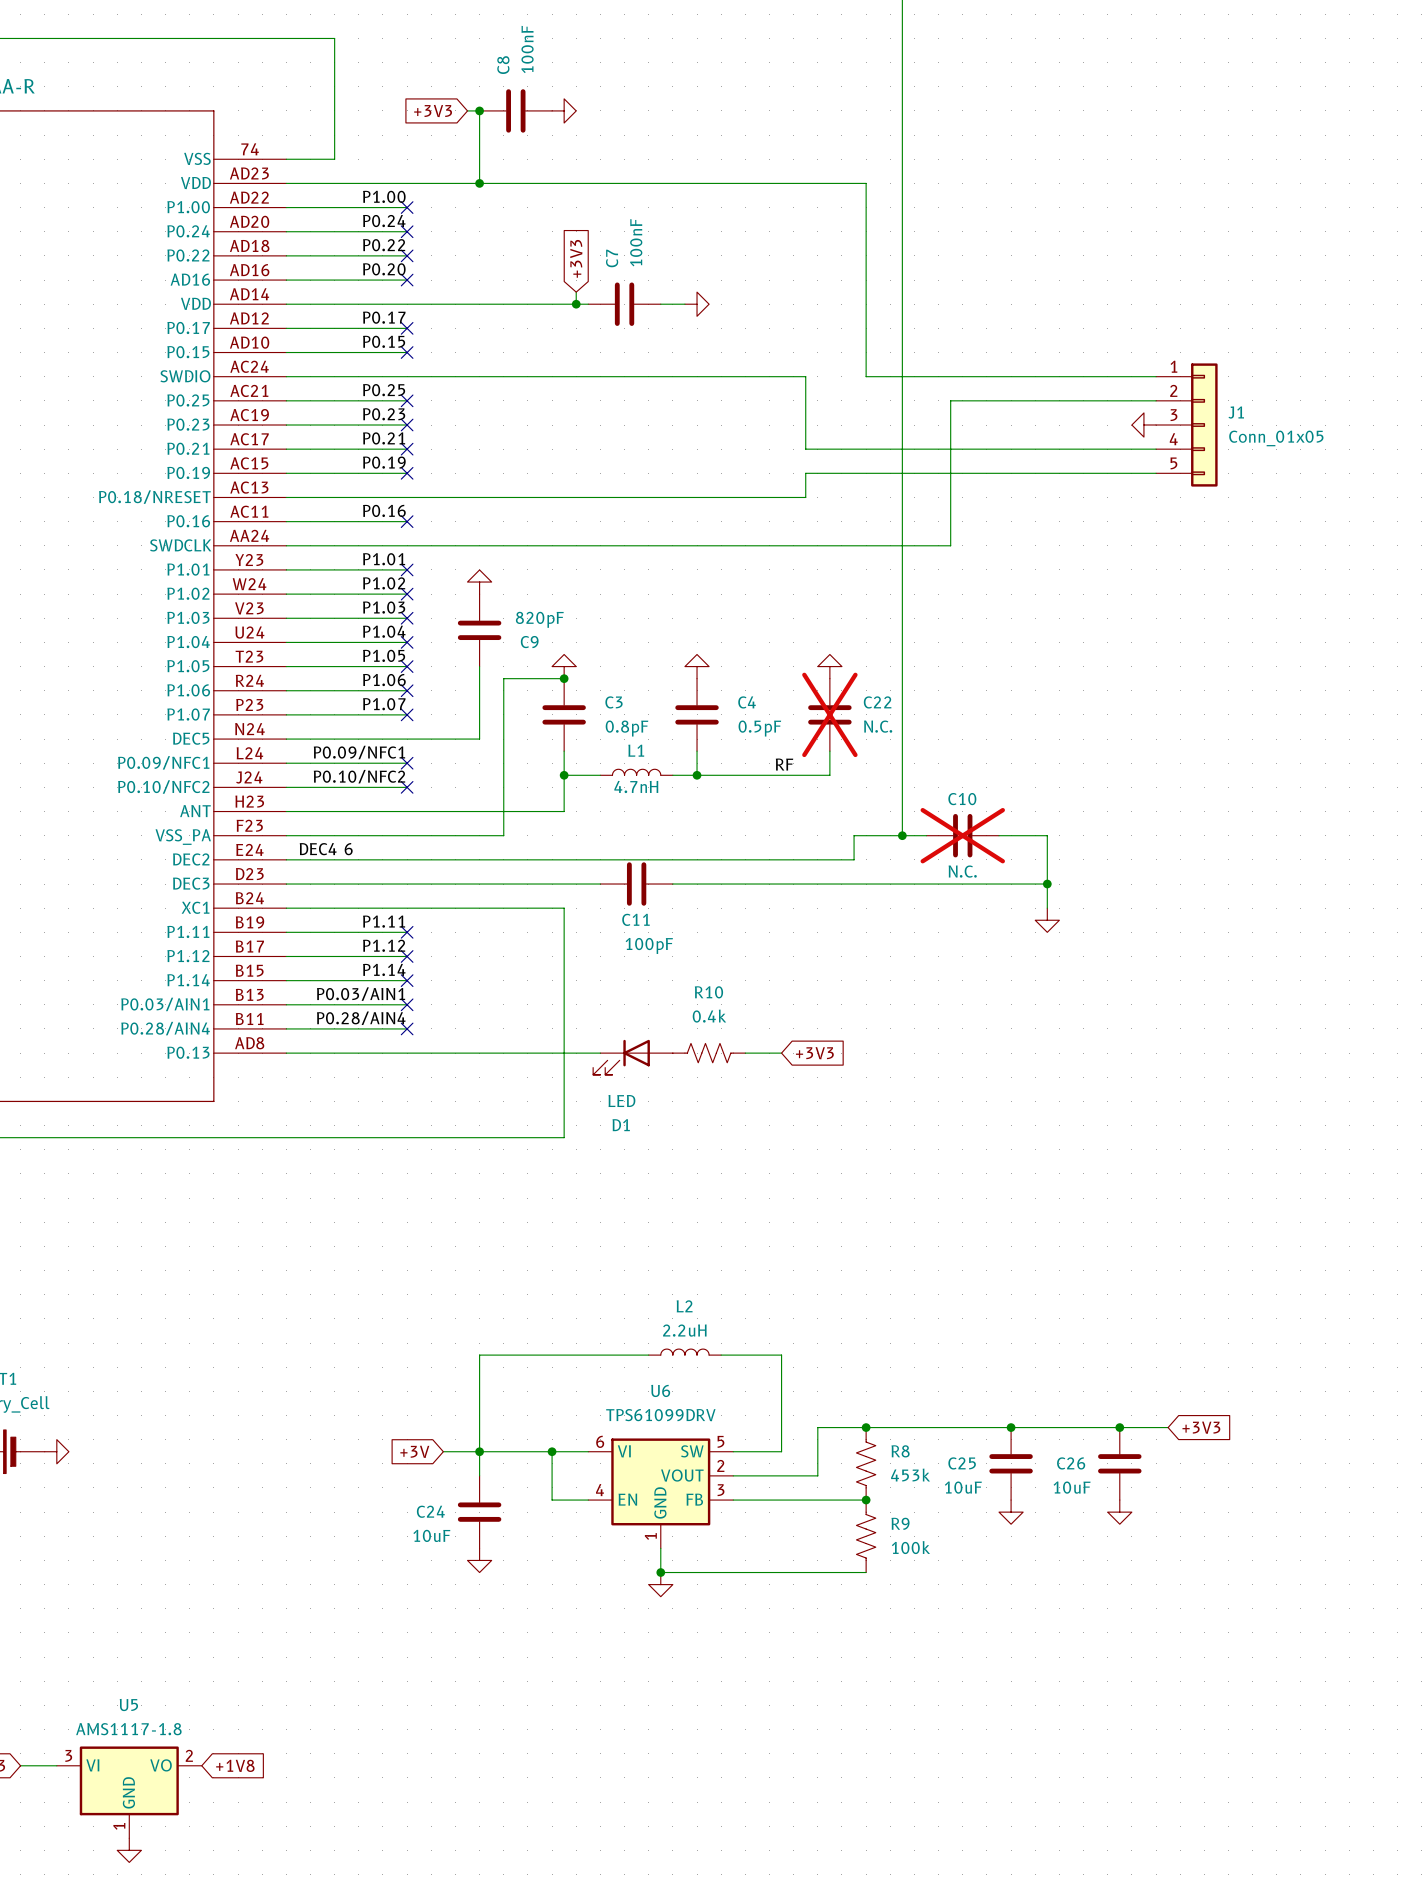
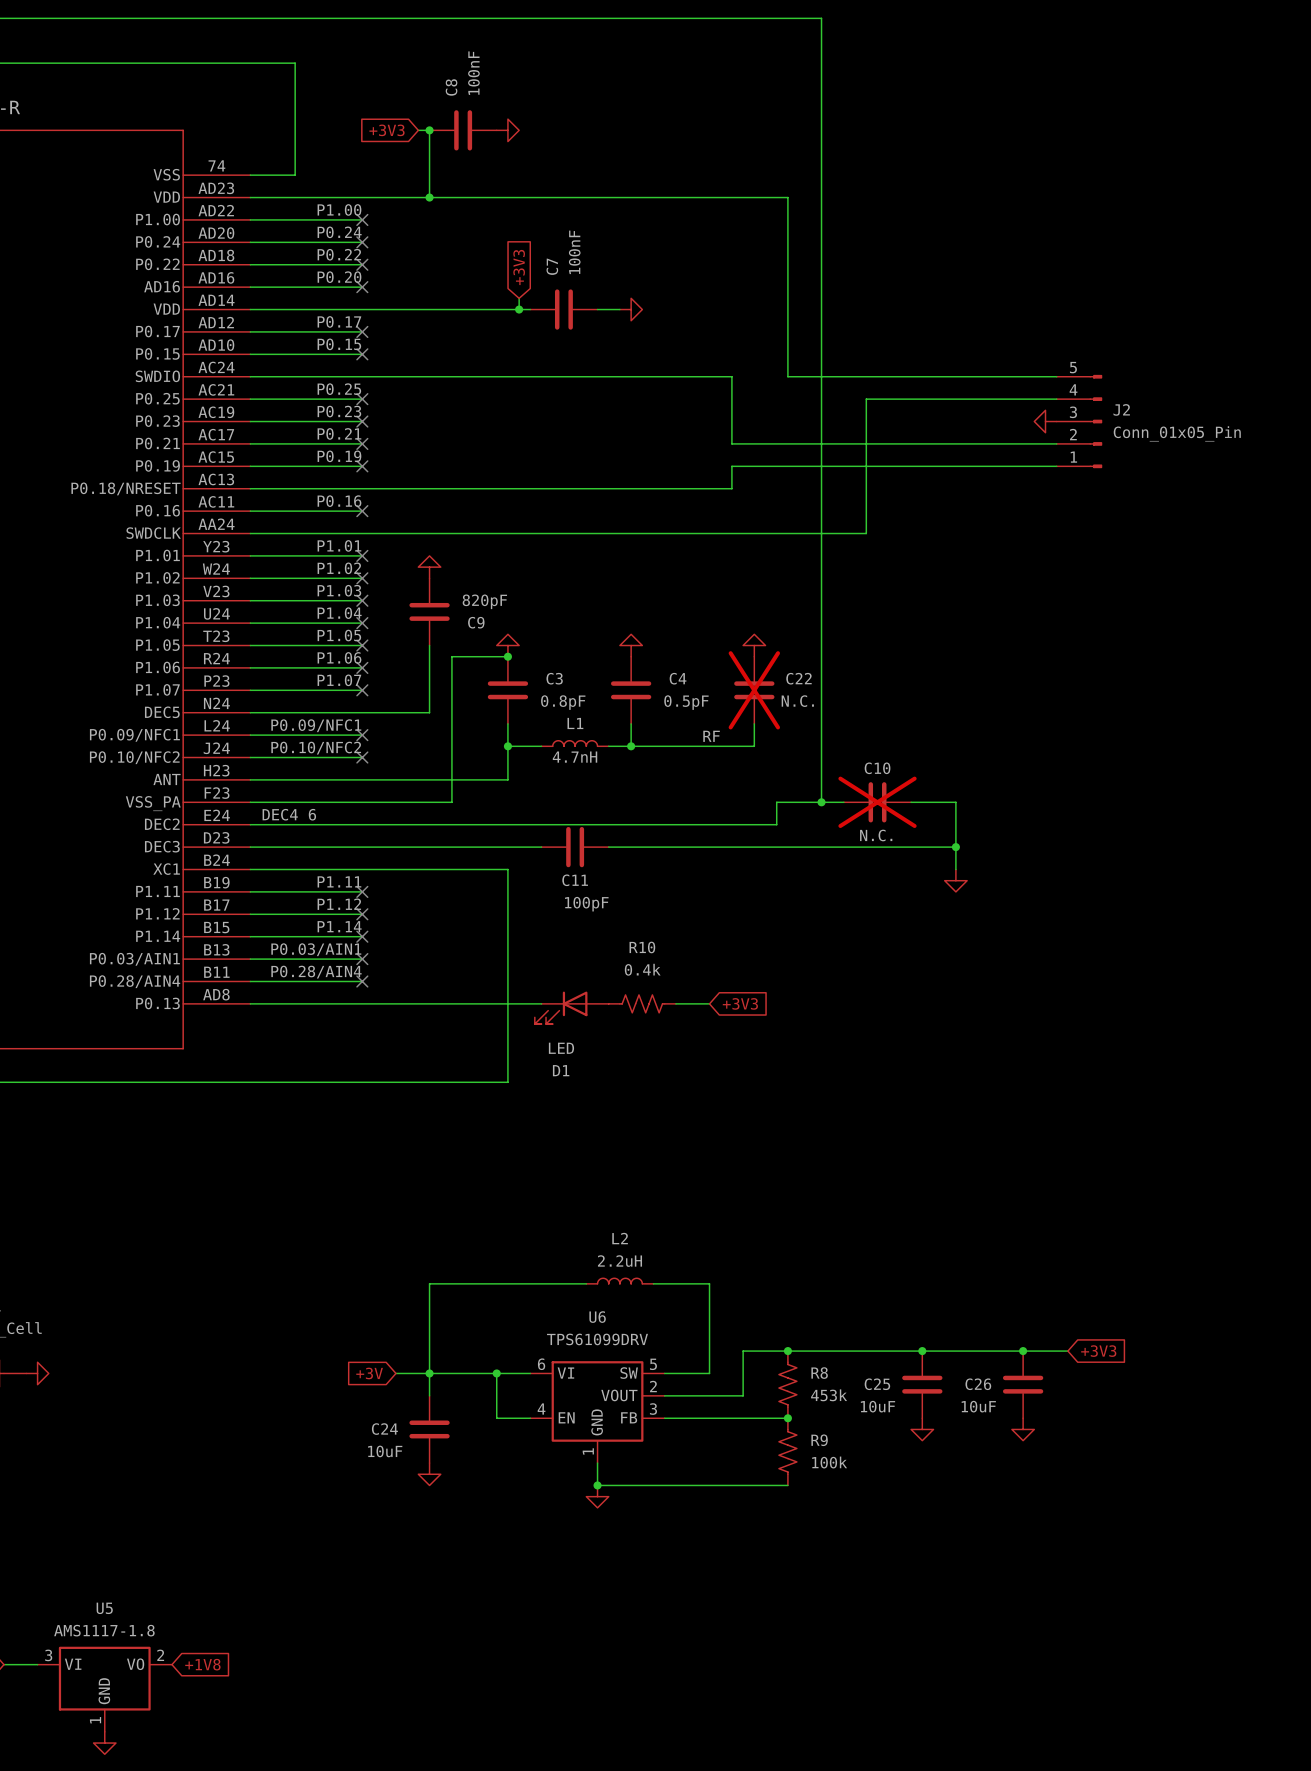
J2: none -> Conn_01x05_Pin (1079, 421)
J1: Conn_01x05 (1186, 425) -> none

